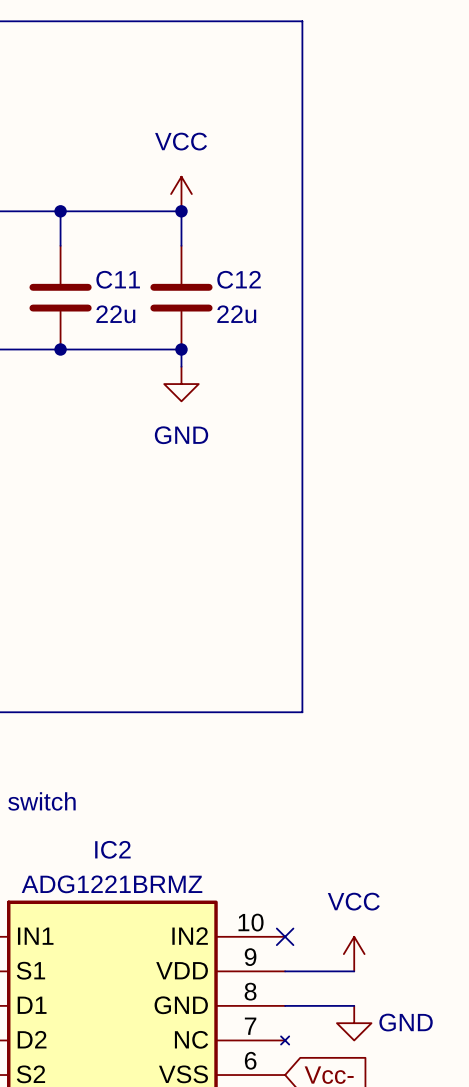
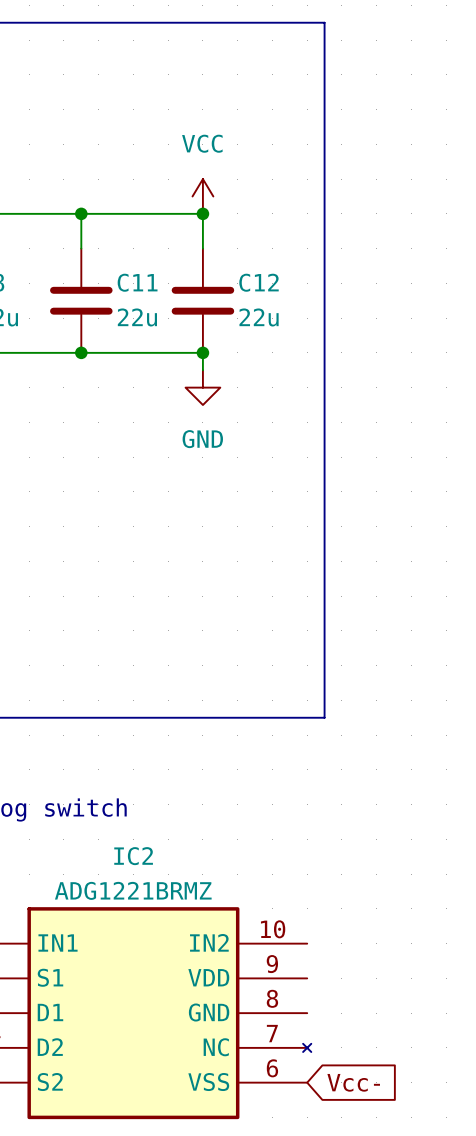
no-connect mark: (285, 936) -> none
power symbol: VCC (354, 954) -> none
wire: (285, 971) (354, 971) -> none
wire: (285, 1005) (354, 1005) -> none
power symbol: GND (354, 1023) -> none

